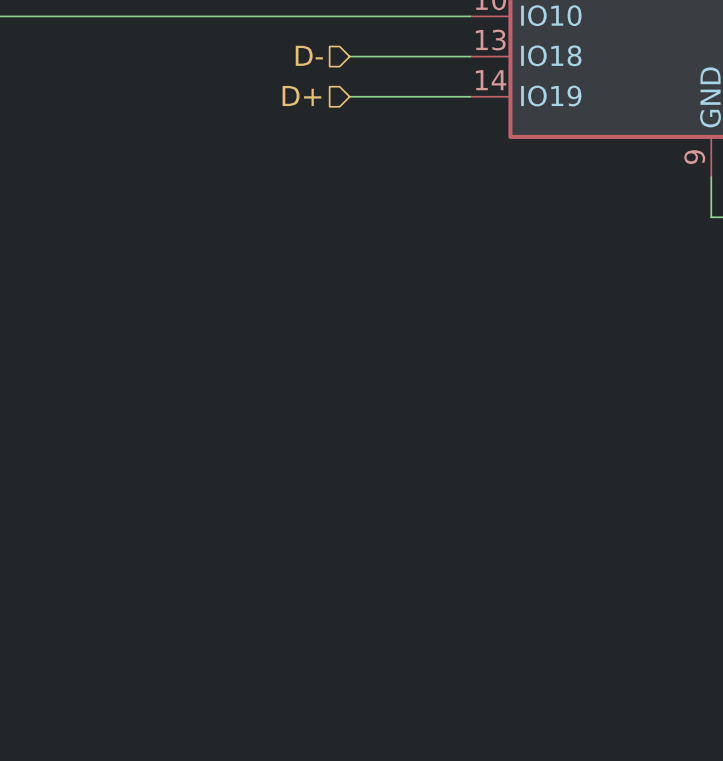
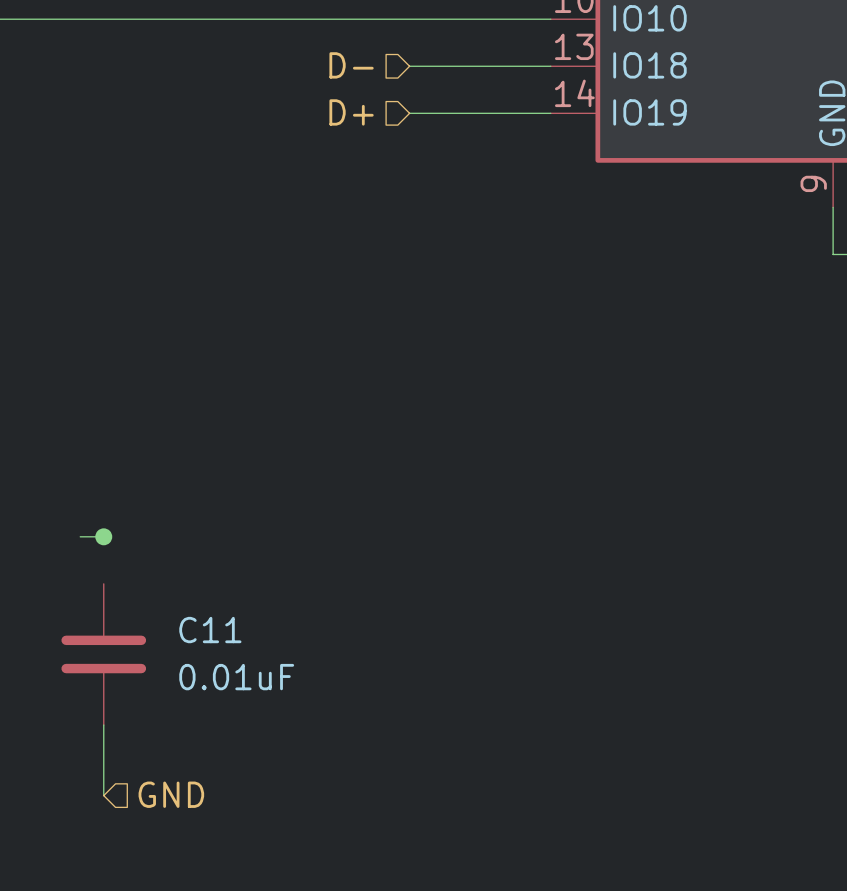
wire: none -> (80, 536) (103, 536)
junction: none -> (103, 536)
C11: none -> 0.01uF (103, 654)
wire: none -> (103, 725) (103, 795)
hierarchical label: none -> GND (171, 794)

